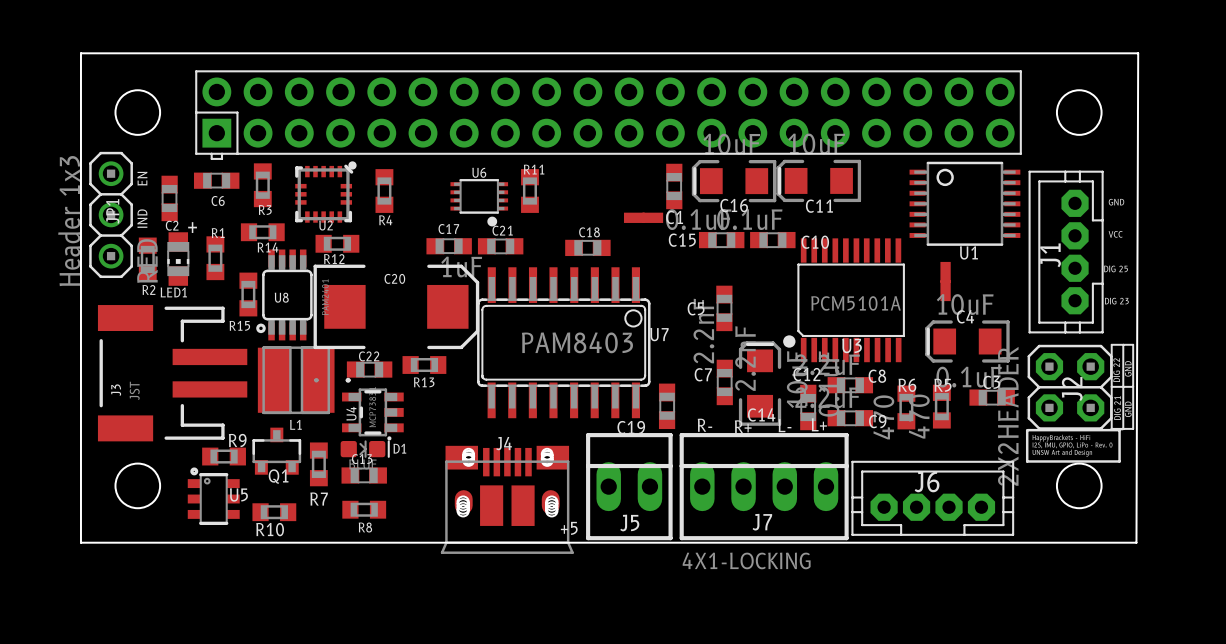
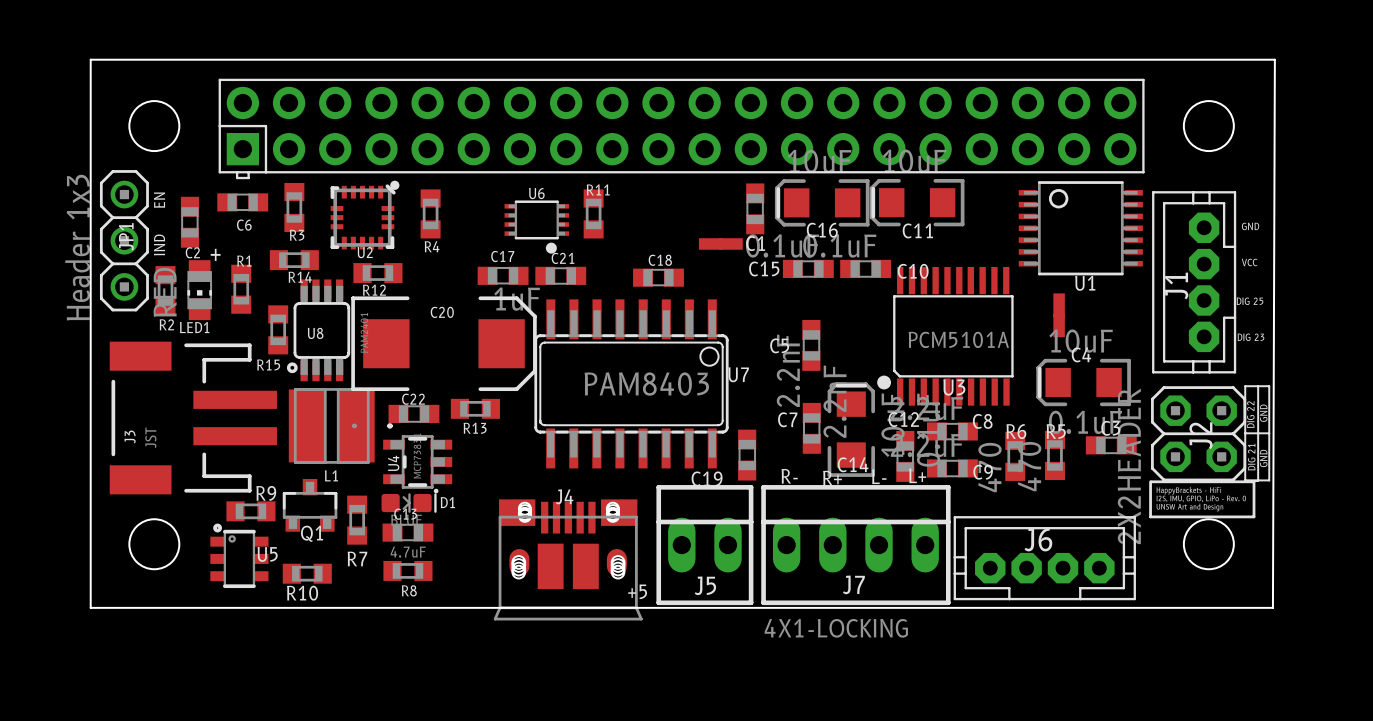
C13 value: none -> 4.7uF (408, 552)

